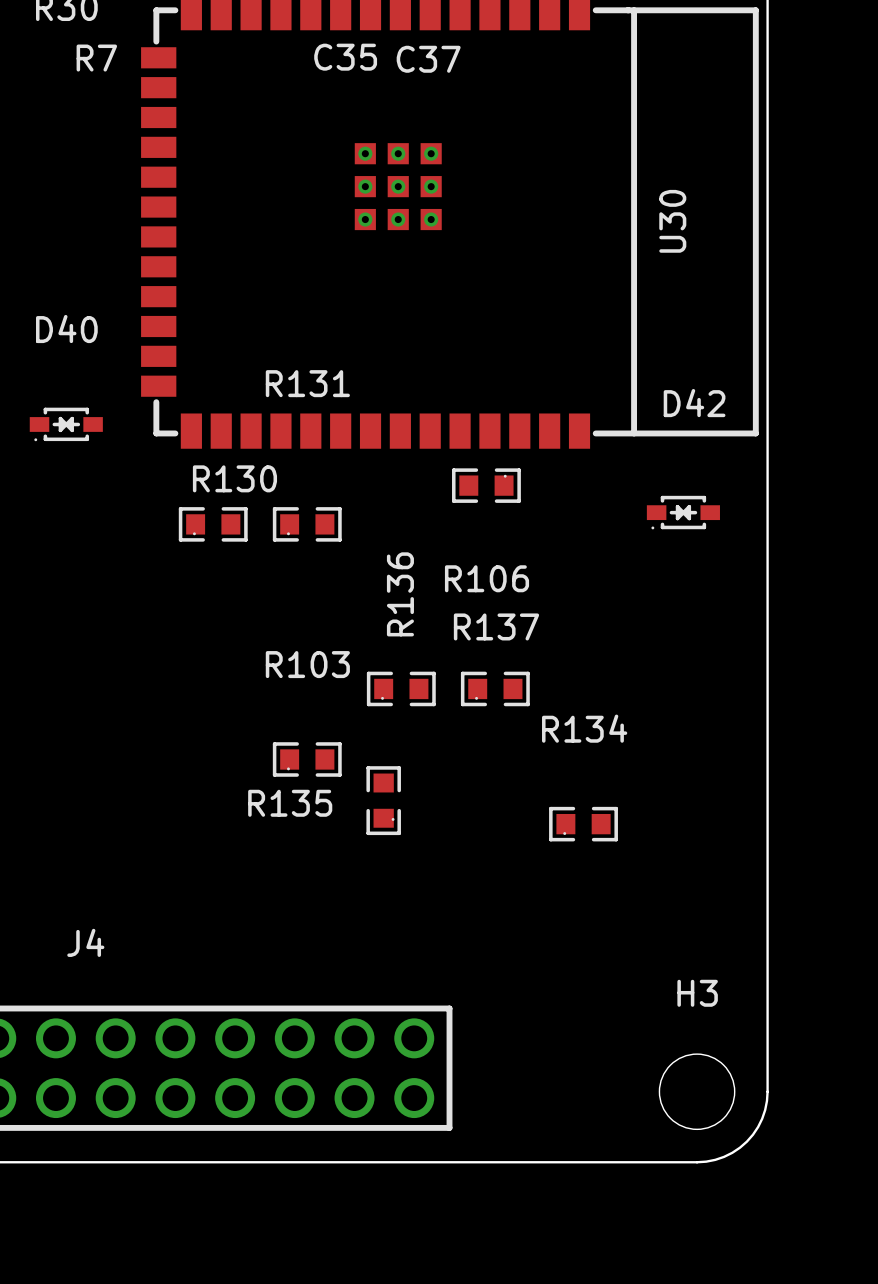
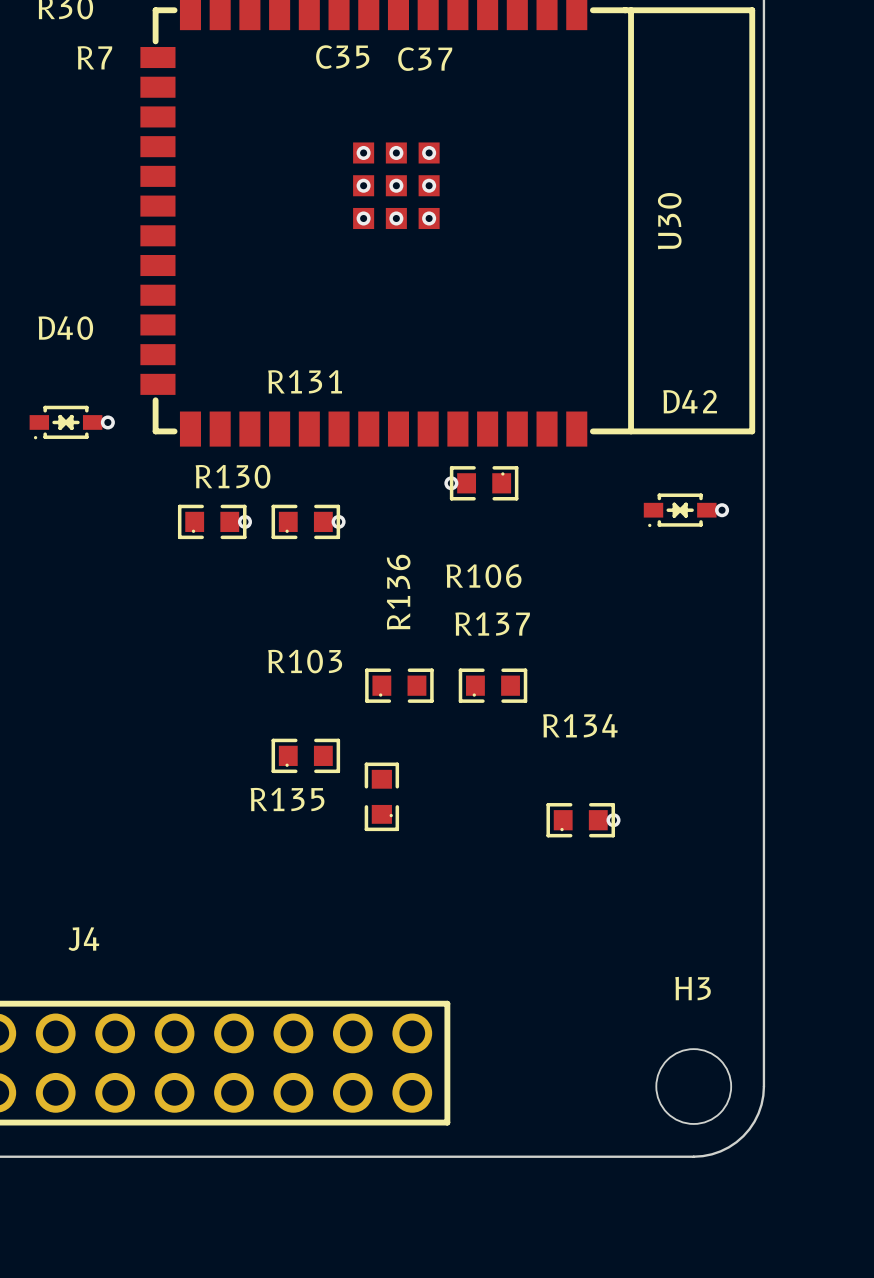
via: none -> (107, 422)
via: none -> (451, 483)
via: none -> (722, 510)
via: none -> (244, 521)
via: none -> (338, 521)
via: none -> (613, 820)

